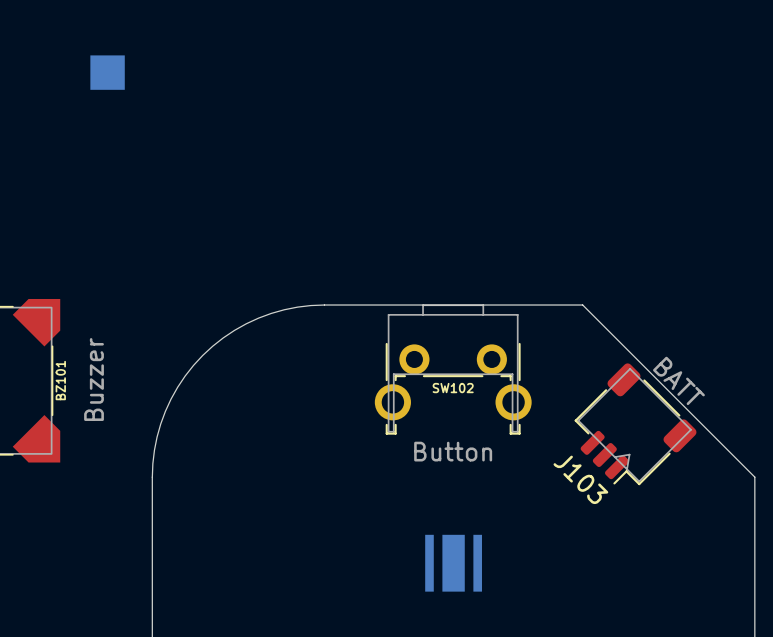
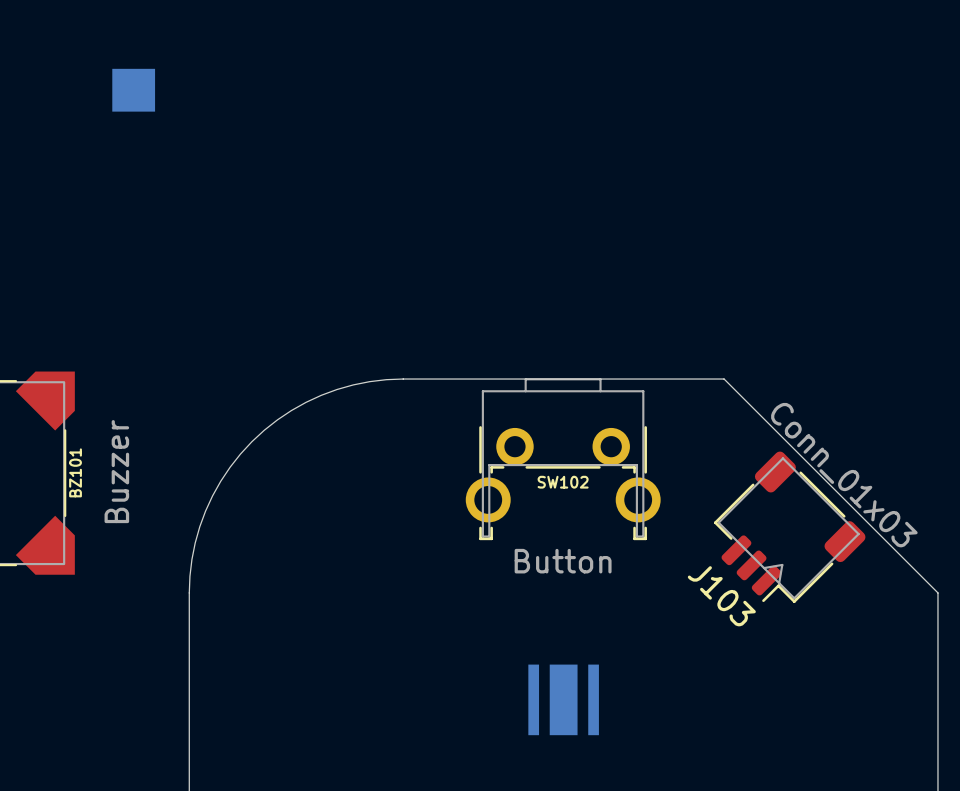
J103 value: BATT (678, 380) -> Conn_01x03 (844, 475)

